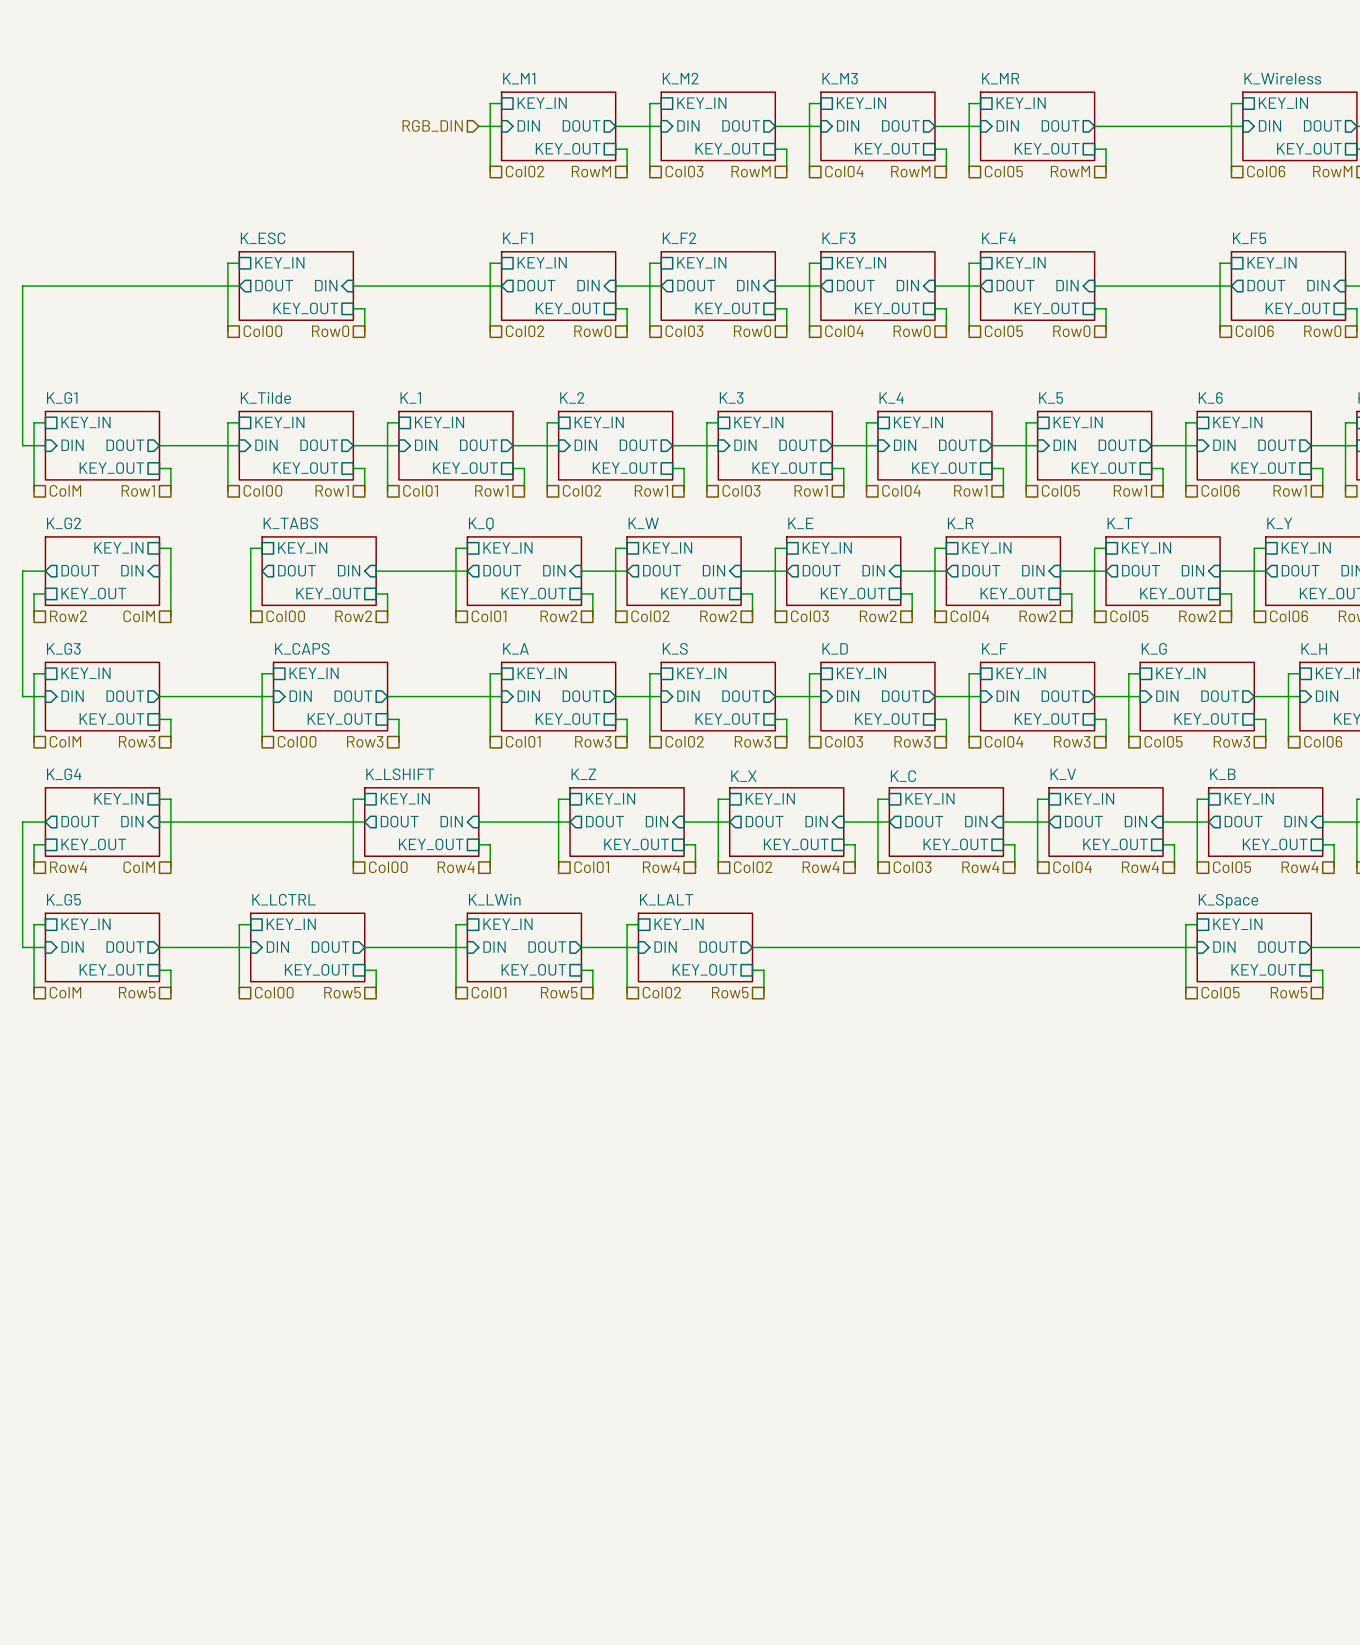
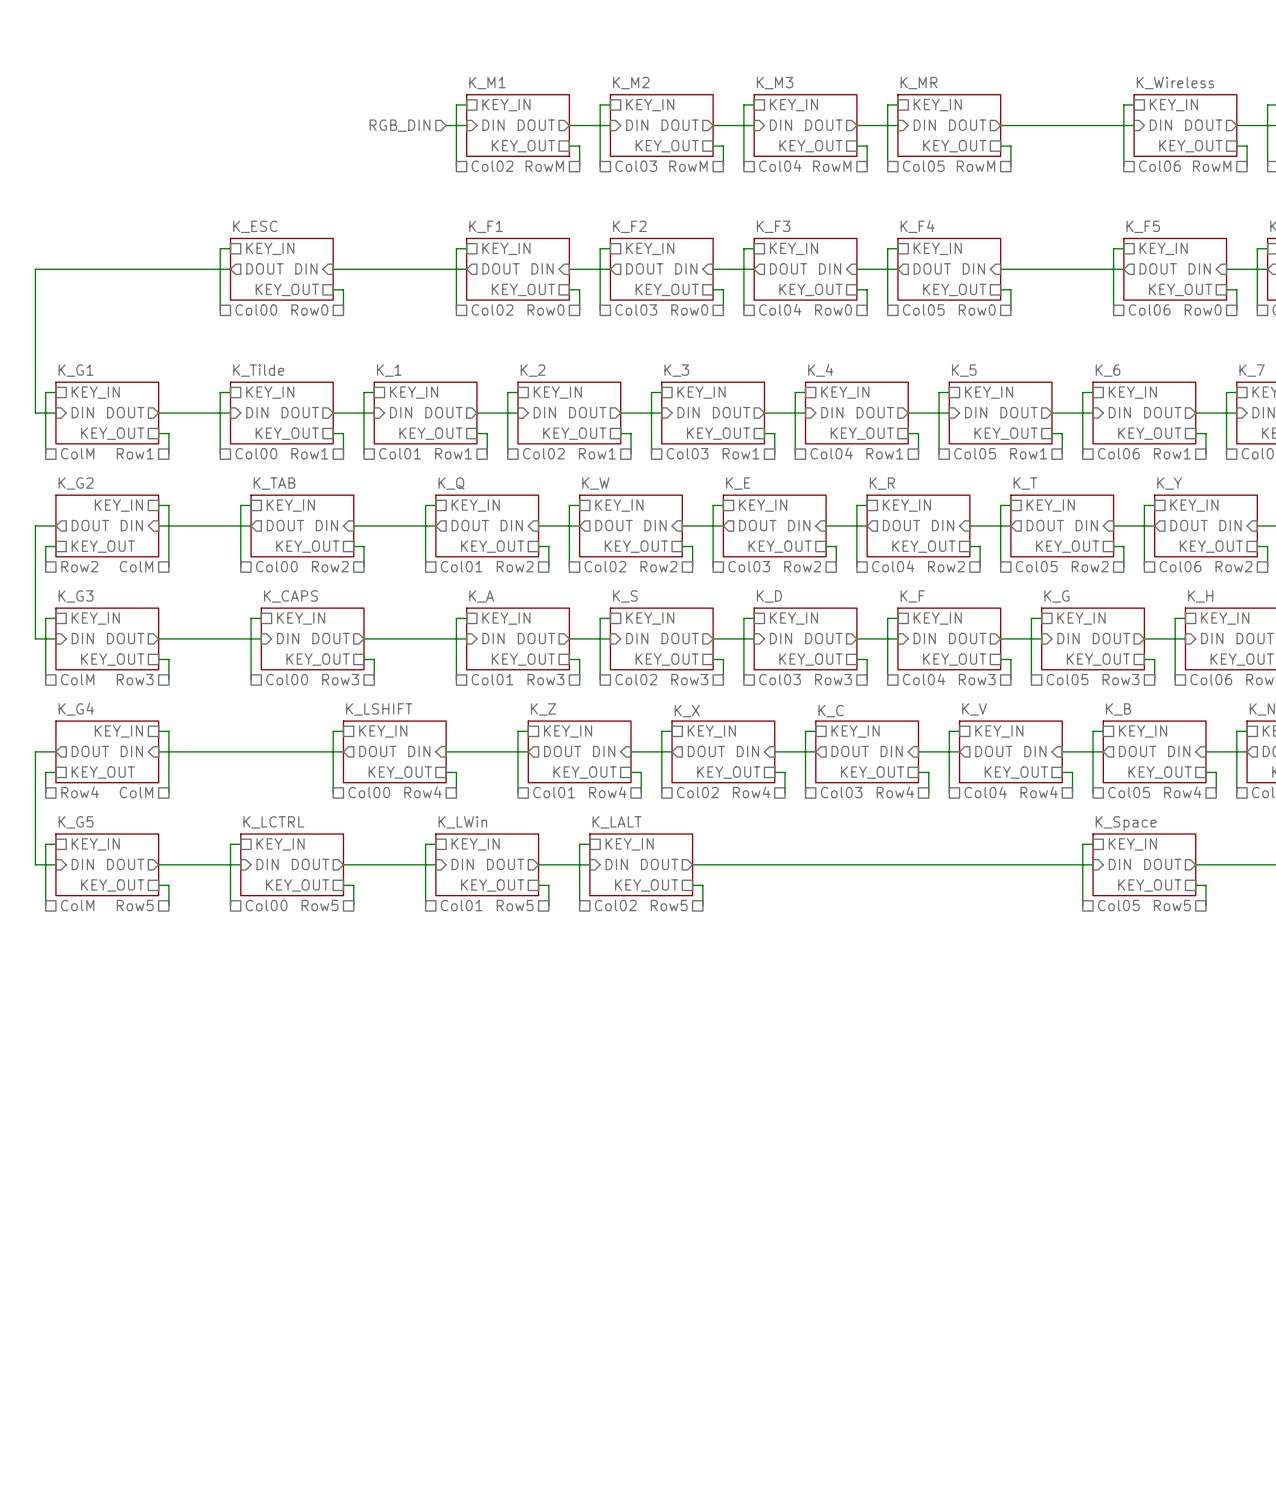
sheet K_TABS name: K_TABS (290, 523) -> K_TAB (274, 483)
wire: none -> (158, 525) (251, 525)

